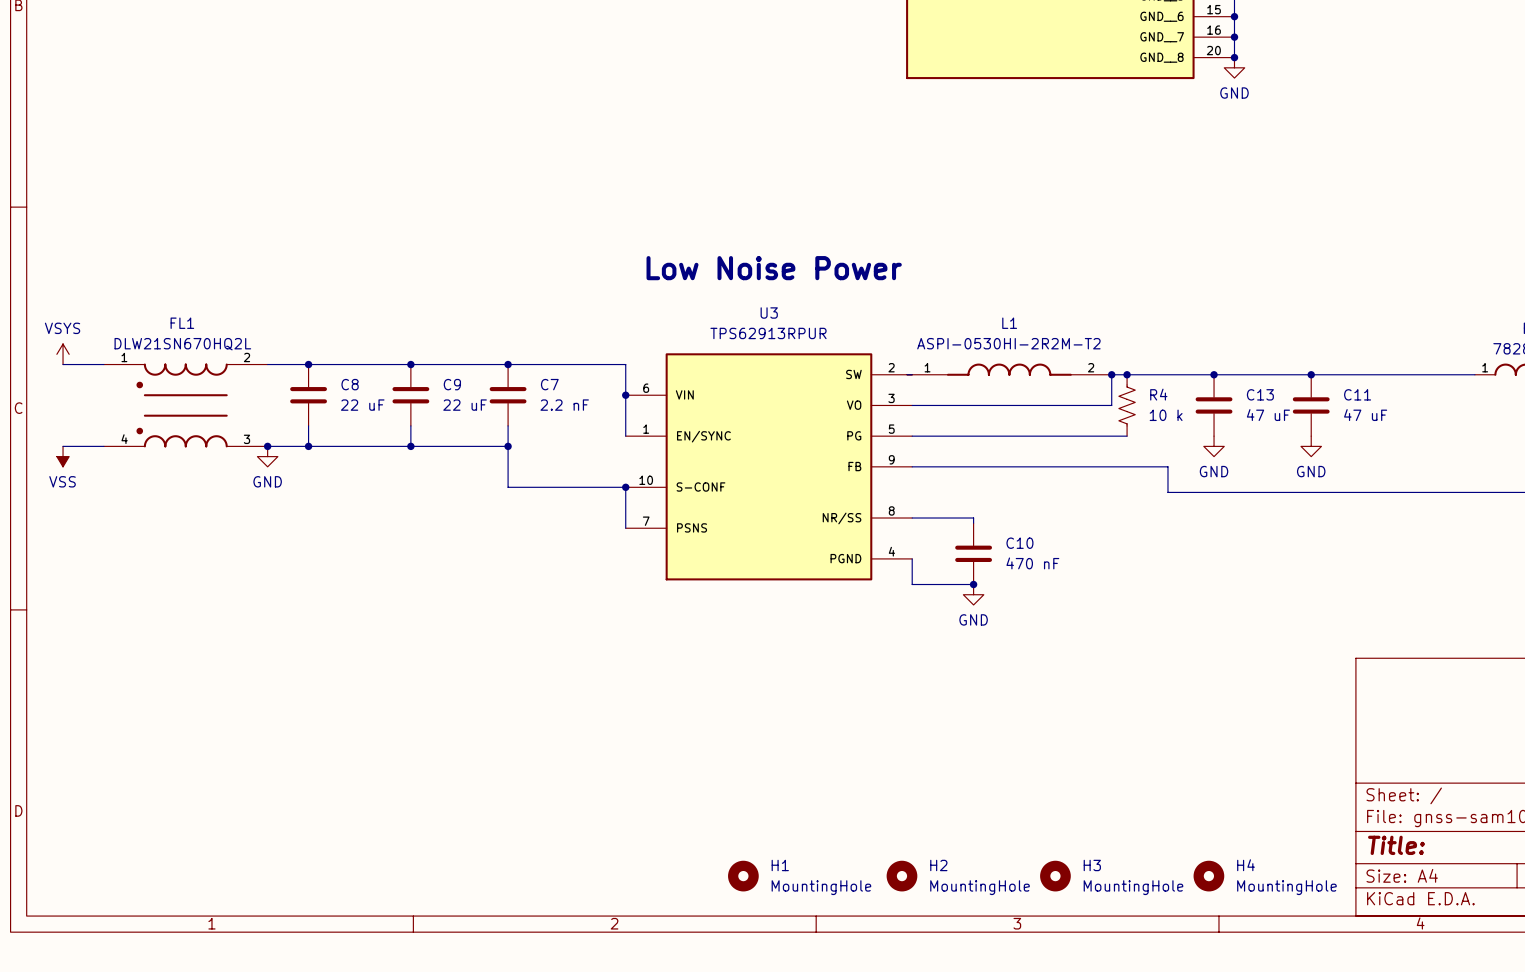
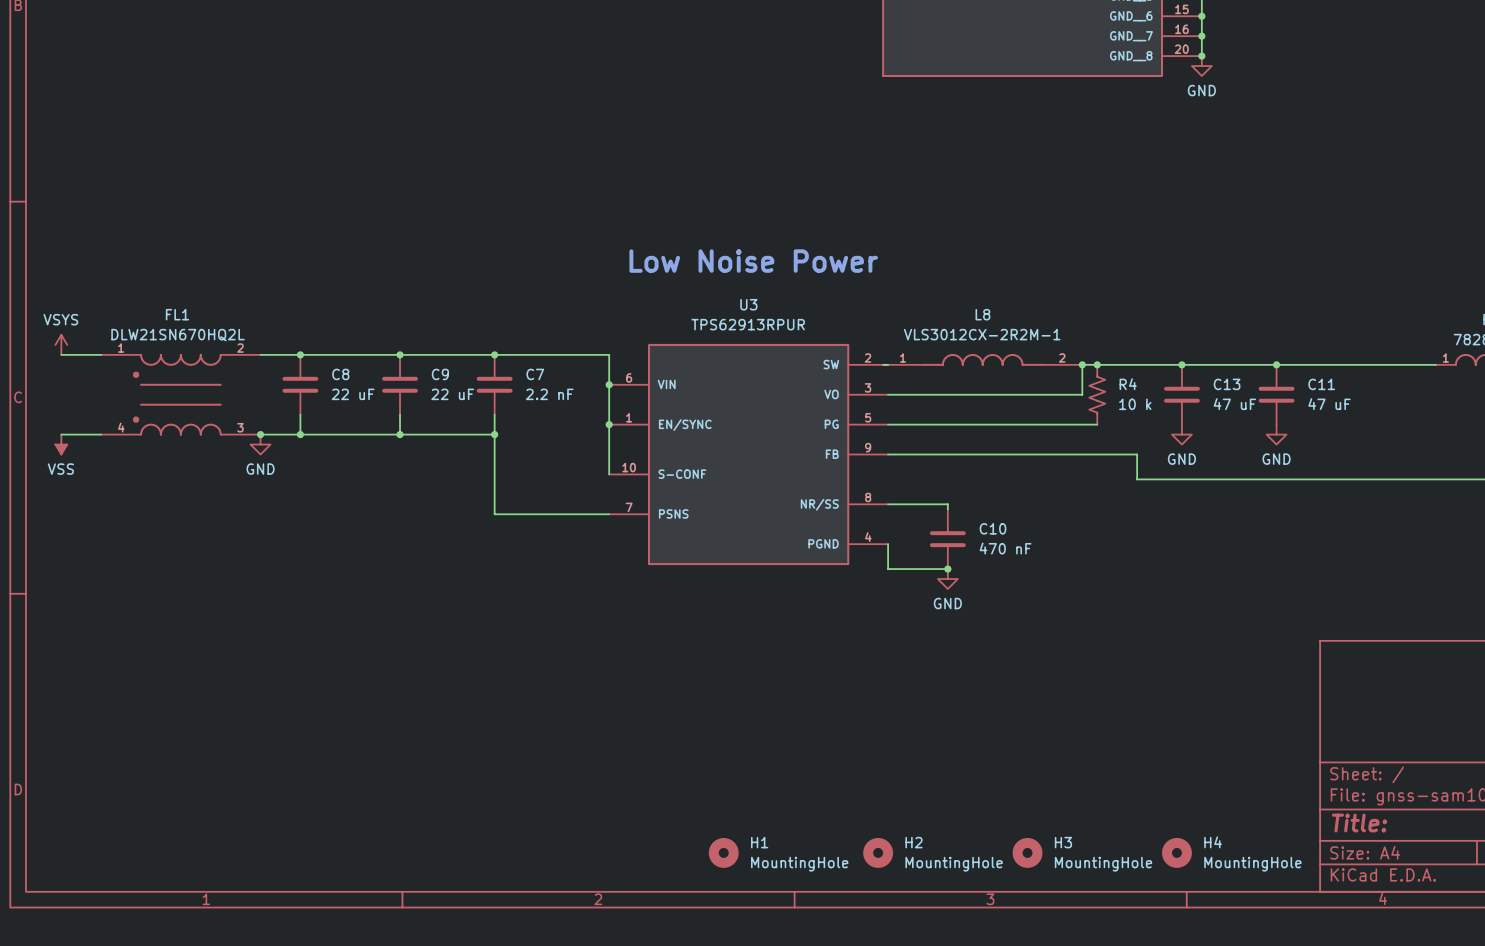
L1 name: L1 (1009, 323) -> L8 (982, 314)
L1 value: ASPI-0530HI-2R2M-T2 (1008, 343) -> VLS3012CX-2R2M-1 (982, 334)
wire: none -> (609, 424) (609, 474)
junction: none -> (609, 424)
wire: (508, 487) (625, 487) (625, 528) -> (494, 474) (494, 514) (609, 514)
junction: (625, 487) -> none

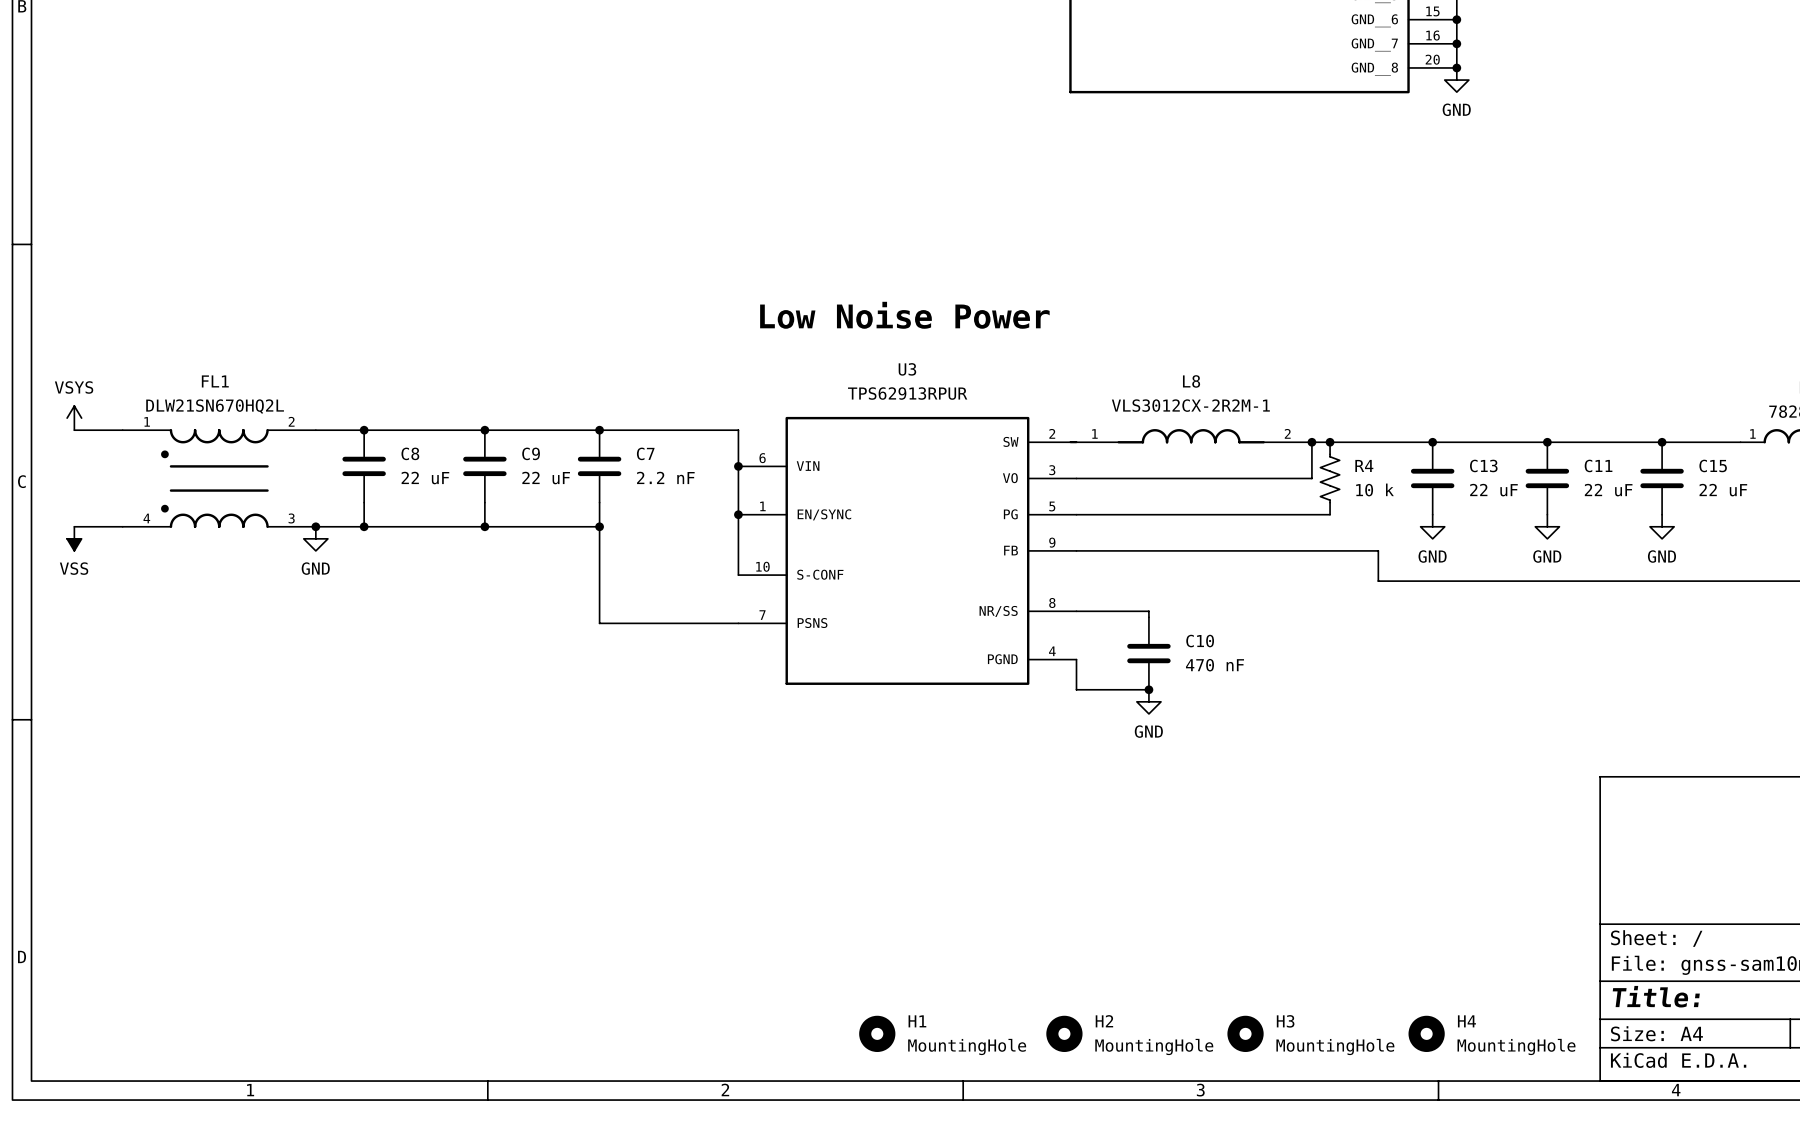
junction: none -> (1662, 442)
C15: none -> 22 uF (1662, 478)
C13 value: 47 uF (1234, 404) -> 22 uF (1493, 490)
C11 value: 47 uF (1329, 404) -> 22 uF (1608, 490)
power symbol: none -> GND (1662, 526)

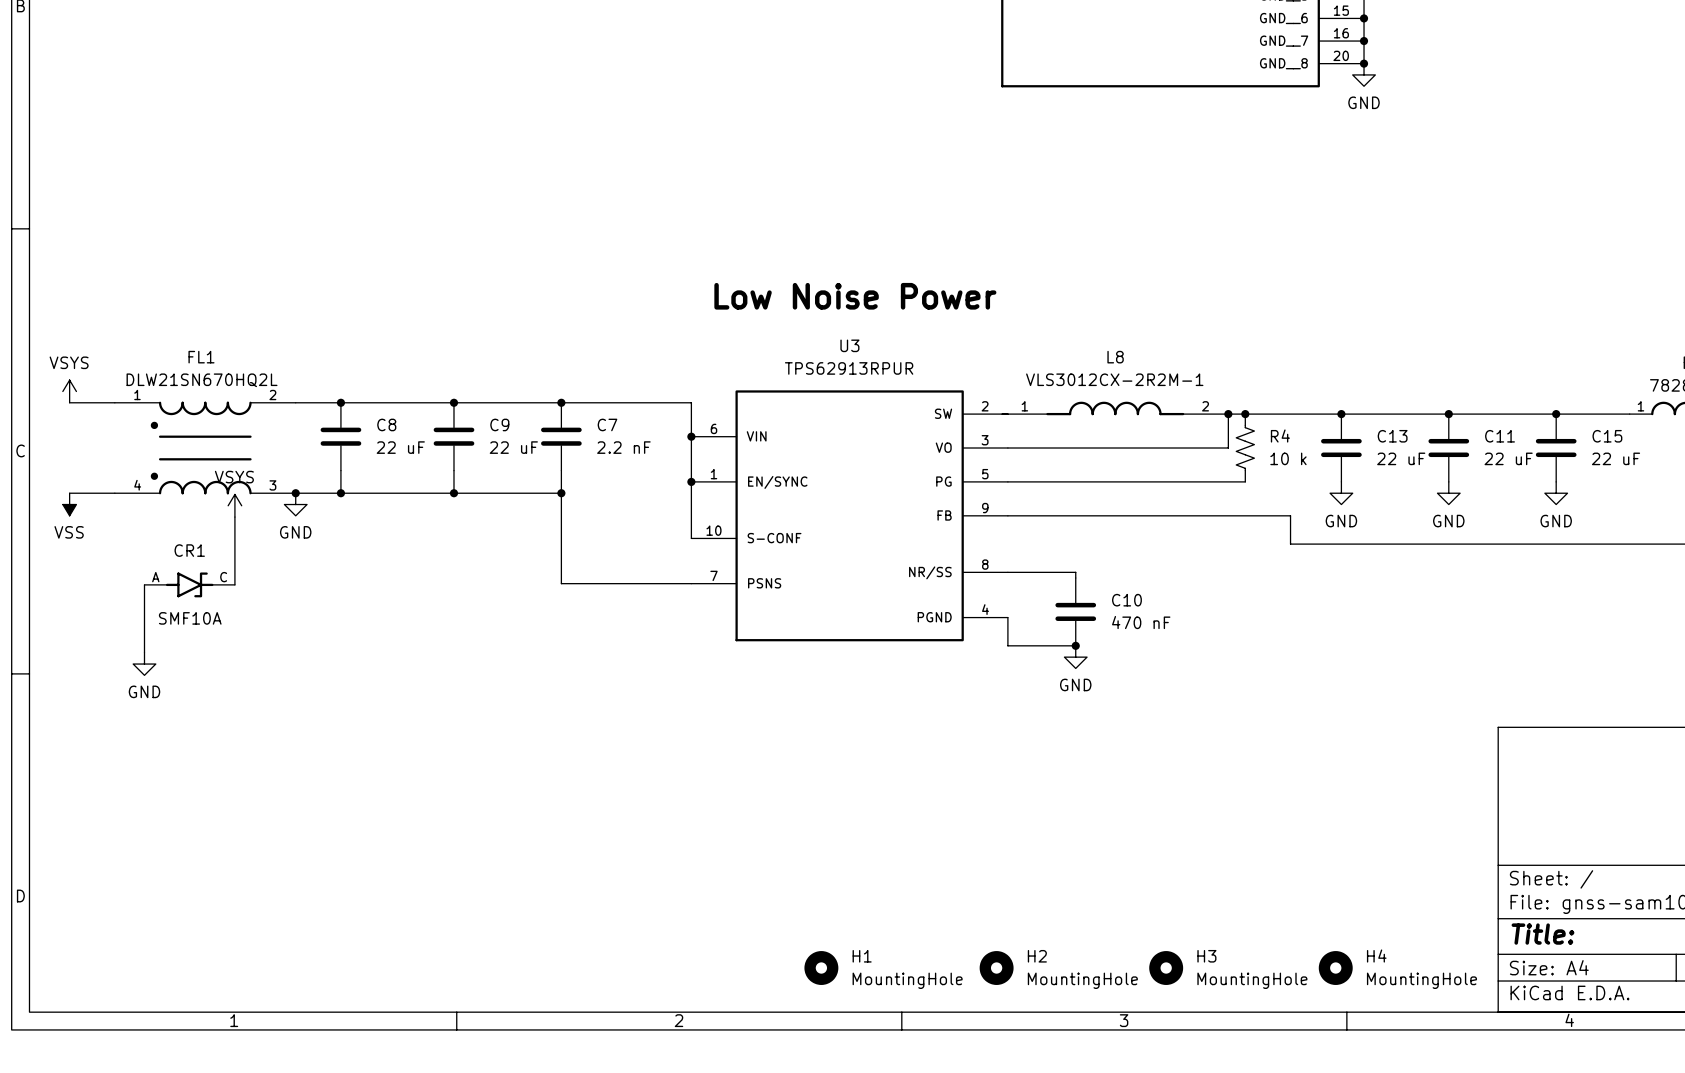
power symbol: none -> VSYS (234, 505)
wire: none -> (234, 517) (234, 584)
wire: none -> (144, 584) (144, 652)
CR1: none -> SMF10A (189, 584)
power symbol: none -> GND (144, 664)

